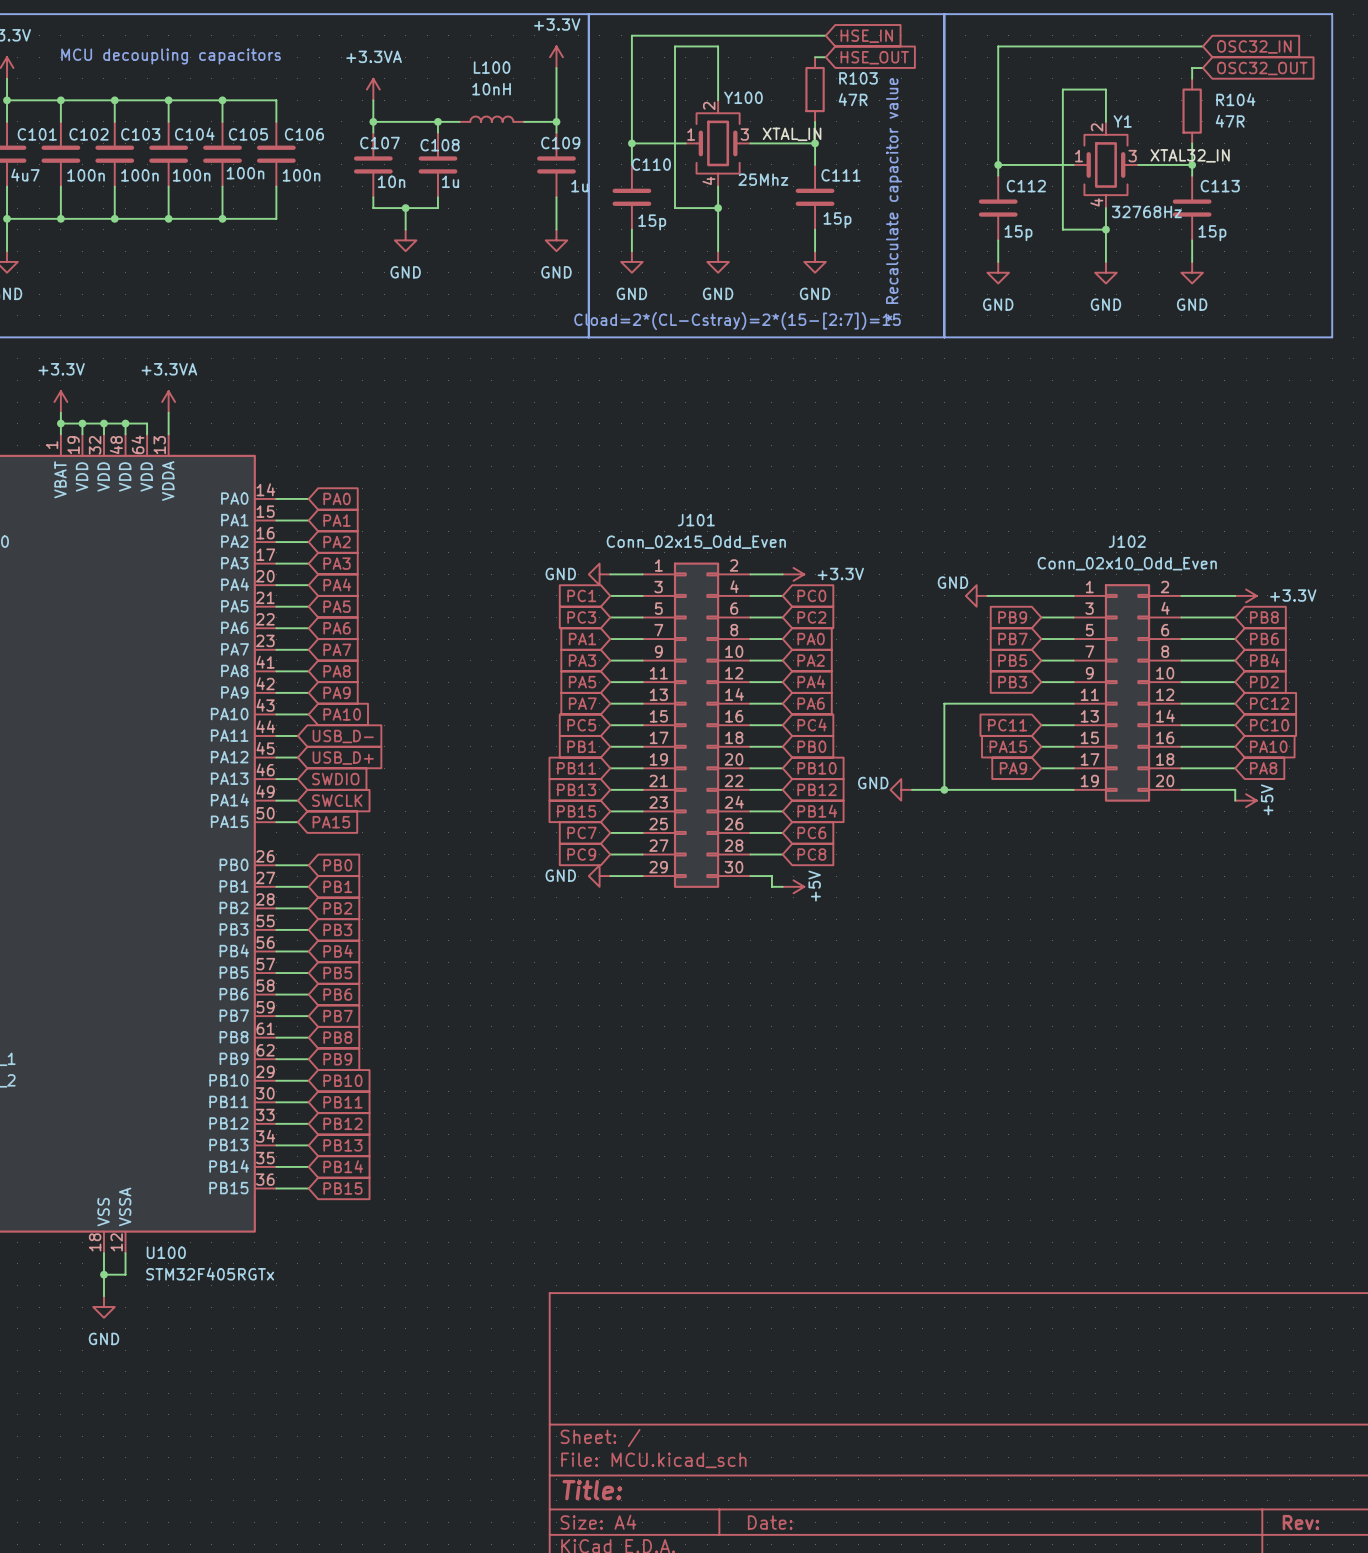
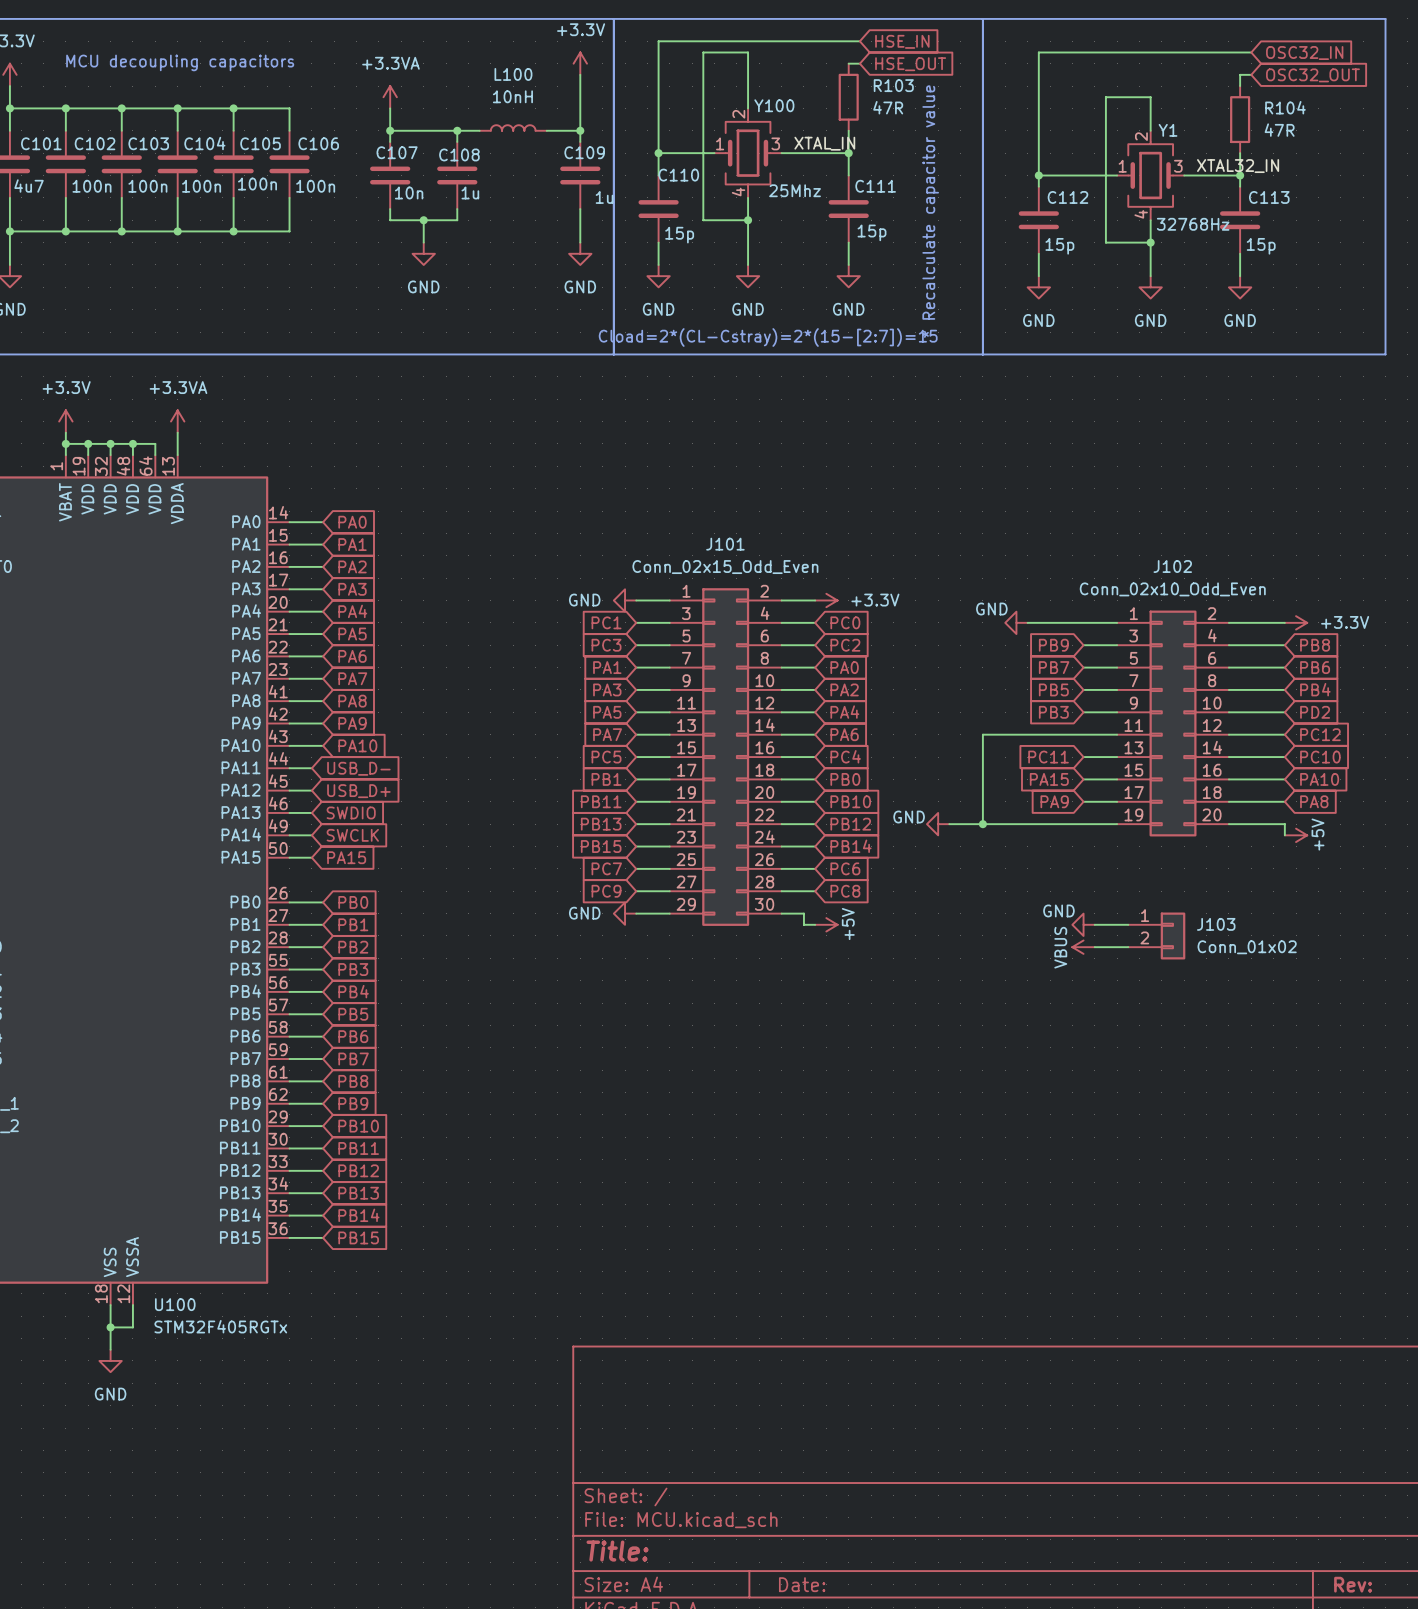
power symbol: none -> GND (1083, 924)
wire: none -> (1094, 924) (1128, 924)
J103: none -> Conn_01x02 (1156, 935)
power symbol: none -> VBUS (1083, 947)
wire: none -> (1094, 947) (1128, 947)

